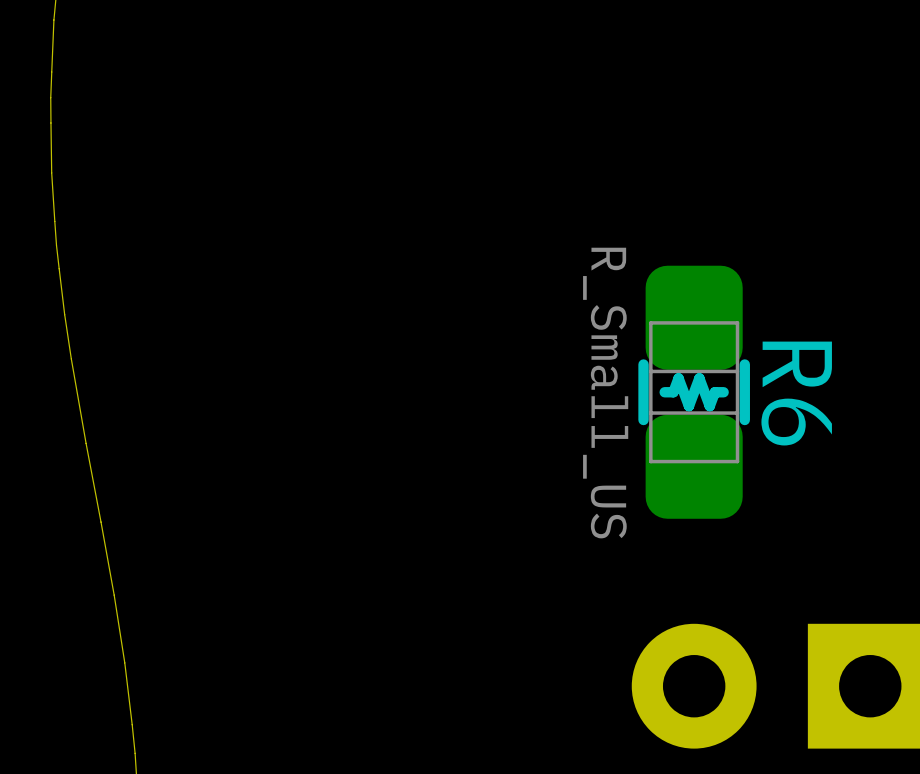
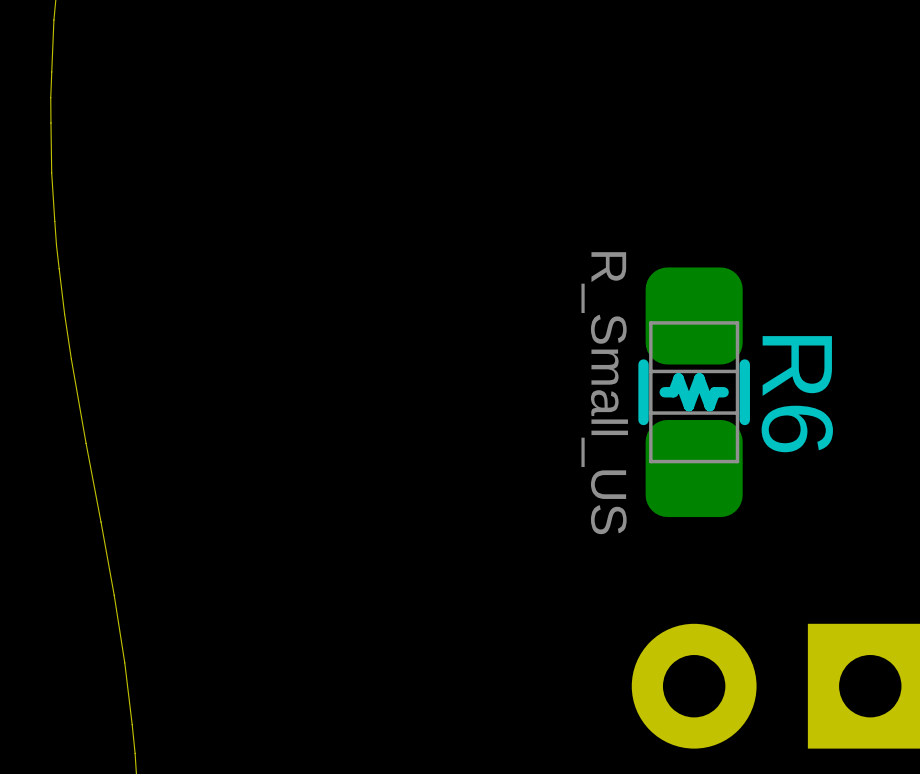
R6 footprint: [638, 265, 750, 519] -> [638, 267, 750, 518]

